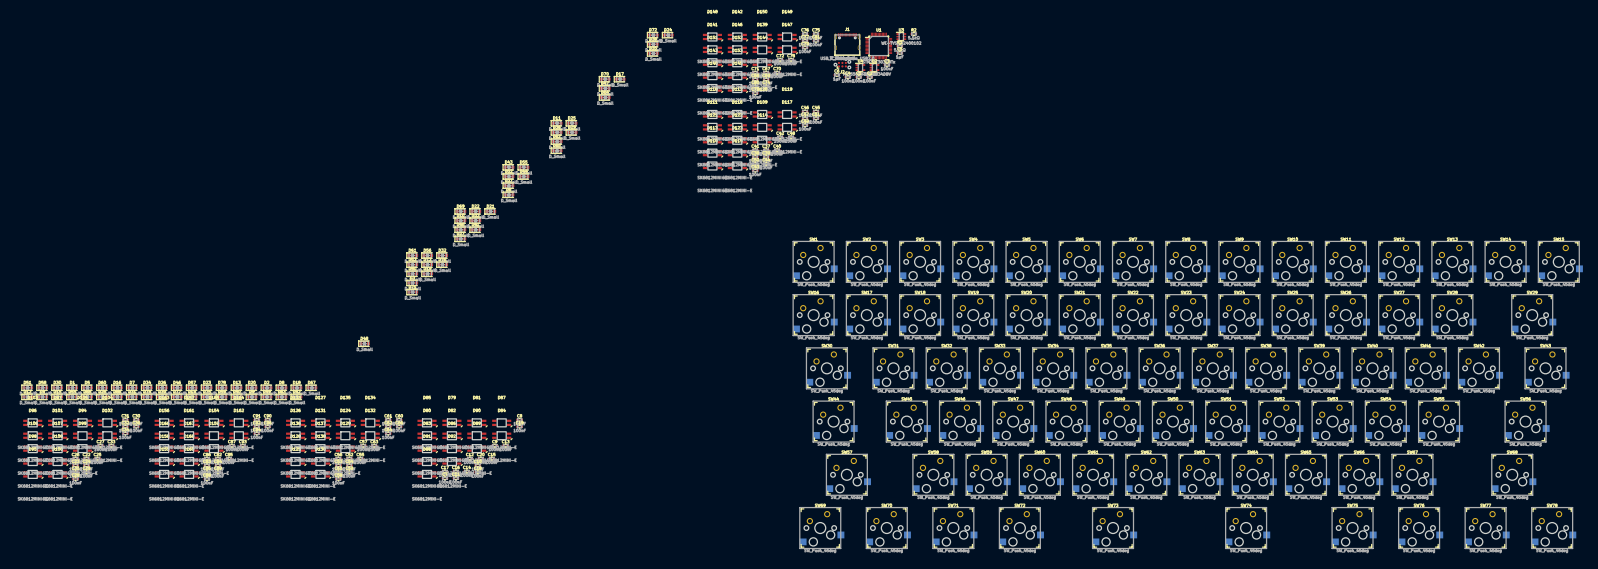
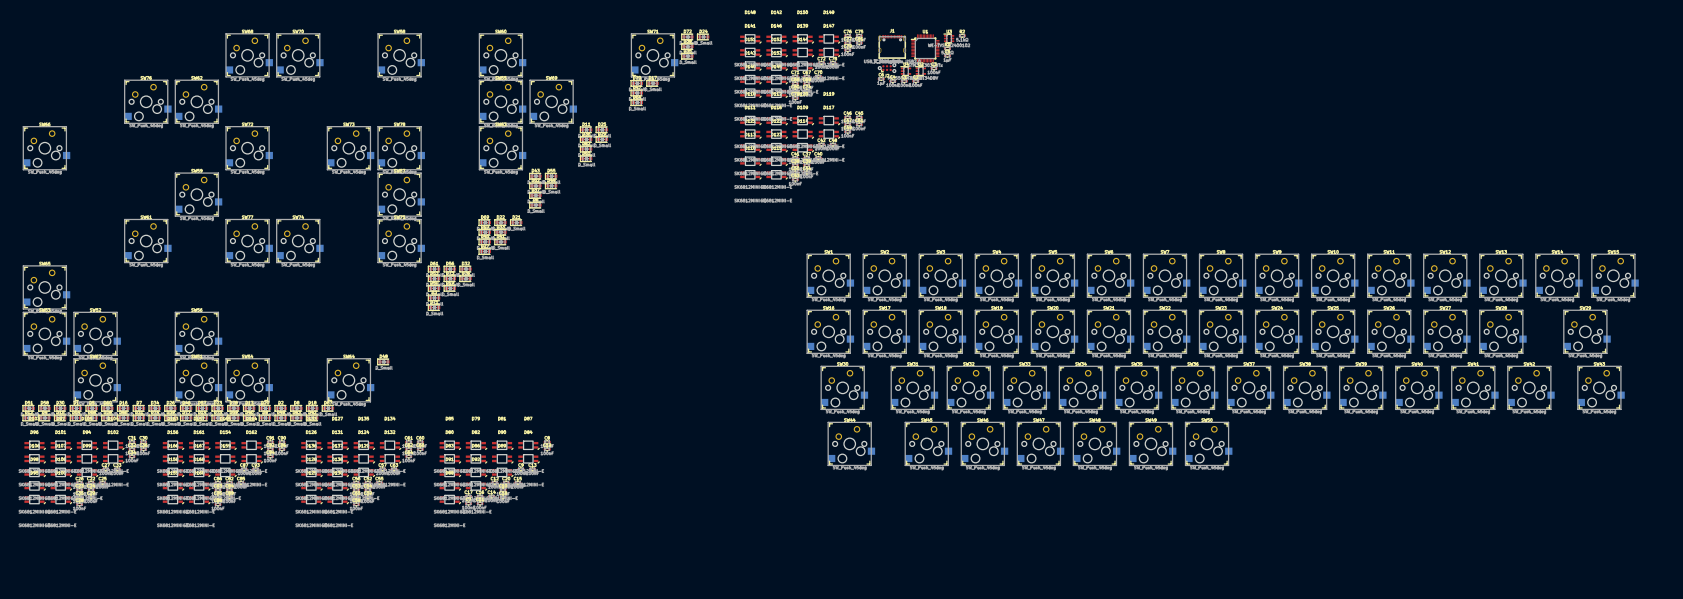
part position: (815, 261) -> (830, 275)
part position: (868, 261) -> (886, 275)
part position: (921, 261) -> (942, 275)
part position: (975, 261) -> (998, 275)
part position: (1028, 261) -> (1054, 275)
part position: (1081, 261) -> (1110, 275)
part position: (1134, 261) -> (1166, 275)
part position: (1187, 261) -> (1222, 275)
part position: (1241, 261) -> (1278, 275)
part position: (1294, 261) -> (1334, 275)
part position: (1347, 261) -> (1391, 275)
part position: (1400, 261) -> (1447, 275)
part position: (1454, 261) -> (1503, 275)
part position: (1507, 261) -> (1559, 275)
part position: (1560, 261) -> (1615, 275)
part position: (815, 315) -> (830, 331)
part position: (868, 315) -> (886, 331)
part position: (921, 315) -> (942, 331)
part position: (975, 315) -> (998, 331)
part position: (1028, 315) -> (1054, 331)
part position: (1081, 315) -> (1110, 331)
part position: (1134, 315) -> (1166, 331)
part position: (1187, 315) -> (1222, 331)
part position: (1241, 315) -> (1278, 331)
part position: (1294, 315) -> (1334, 331)
part position: (1347, 315) -> (1391, 331)
part position: (1400, 315) -> (1447, 331)
part position: (1454, 315) -> (1503, 331)
part position: (1533, 315) -> (1587, 331)
part position: (828, 368) -> (844, 387)
part position: (895, 368) -> (914, 387)
part position: (948, 368) -> (970, 387)
part position: (1001, 368) -> (1026, 387)
part position: (1054, 368) -> (1082, 387)
part position: (1108, 368) -> (1138, 387)
part position: (1161, 368) -> (1194, 387)
part position: (1214, 368) -> (1250, 387)
part position: (1267, 368) -> (1306, 387)
part position: (1321, 368) -> (1362, 387)
part position: (1374, 368) -> (1419, 387)
part position: (1427, 368) -> (1475, 387)
part position: (1480, 368) -> (1531, 387)
part position: (1547, 368) -> (1601, 387)
part position: (835, 421) -> (851, 443)
part position: (908, 421) -> (928, 443)
part position: (961, 421) -> (984, 443)
part position: (1014, 421) -> (1040, 443)
part position: (1068, 421) -> (1096, 443)
part position: (1121, 421) -> (1152, 443)
part position: (1174, 421) -> (1208, 443)
part position: (1227, 421) -> (198, 380)
part position: (1281, 421) -> (97, 333)
part position: (1334, 421) -> (46, 333)
part position: (1387, 421) -> (249, 380)
part position: (1440, 421) -> (502, 101)
part position: (1527, 421) -> (198, 333)
part position: (848, 474) -> (401, 194)
part position: (935, 474) -> (401, 55)
part position: (988, 474) -> (198, 194)
part position: (1041, 474) -> (502, 55)
part position: (1094, 474) -> (148, 241)
part position: (1148, 474) -> (198, 101)
part position: (1201, 474) -> (502, 148)
part position: (1254, 474) -> (350, 380)
part position: (1307, 474) -> (46, 287)
part position: (1360, 474) -> (46, 148)
part position: (1414, 474) -> (97, 380)
part position: (1513, 474) -> (249, 55)
part position: (821, 528) -> (553, 101)
part position: (888, 528) -> (300, 55)
part position: (955, 528) -> (654, 55)
part position: (1021, 528) -> (249, 148)
part position: (1114, 528) -> (350, 148)
part position: (1247, 528) -> (300, 241)
part position: (1354, 528) -> (401, 241)
part position: (1420, 528) -> (148, 101)
part position: (1487, 528) -> (249, 241)
part position: (1553, 528) -> (401, 148)

